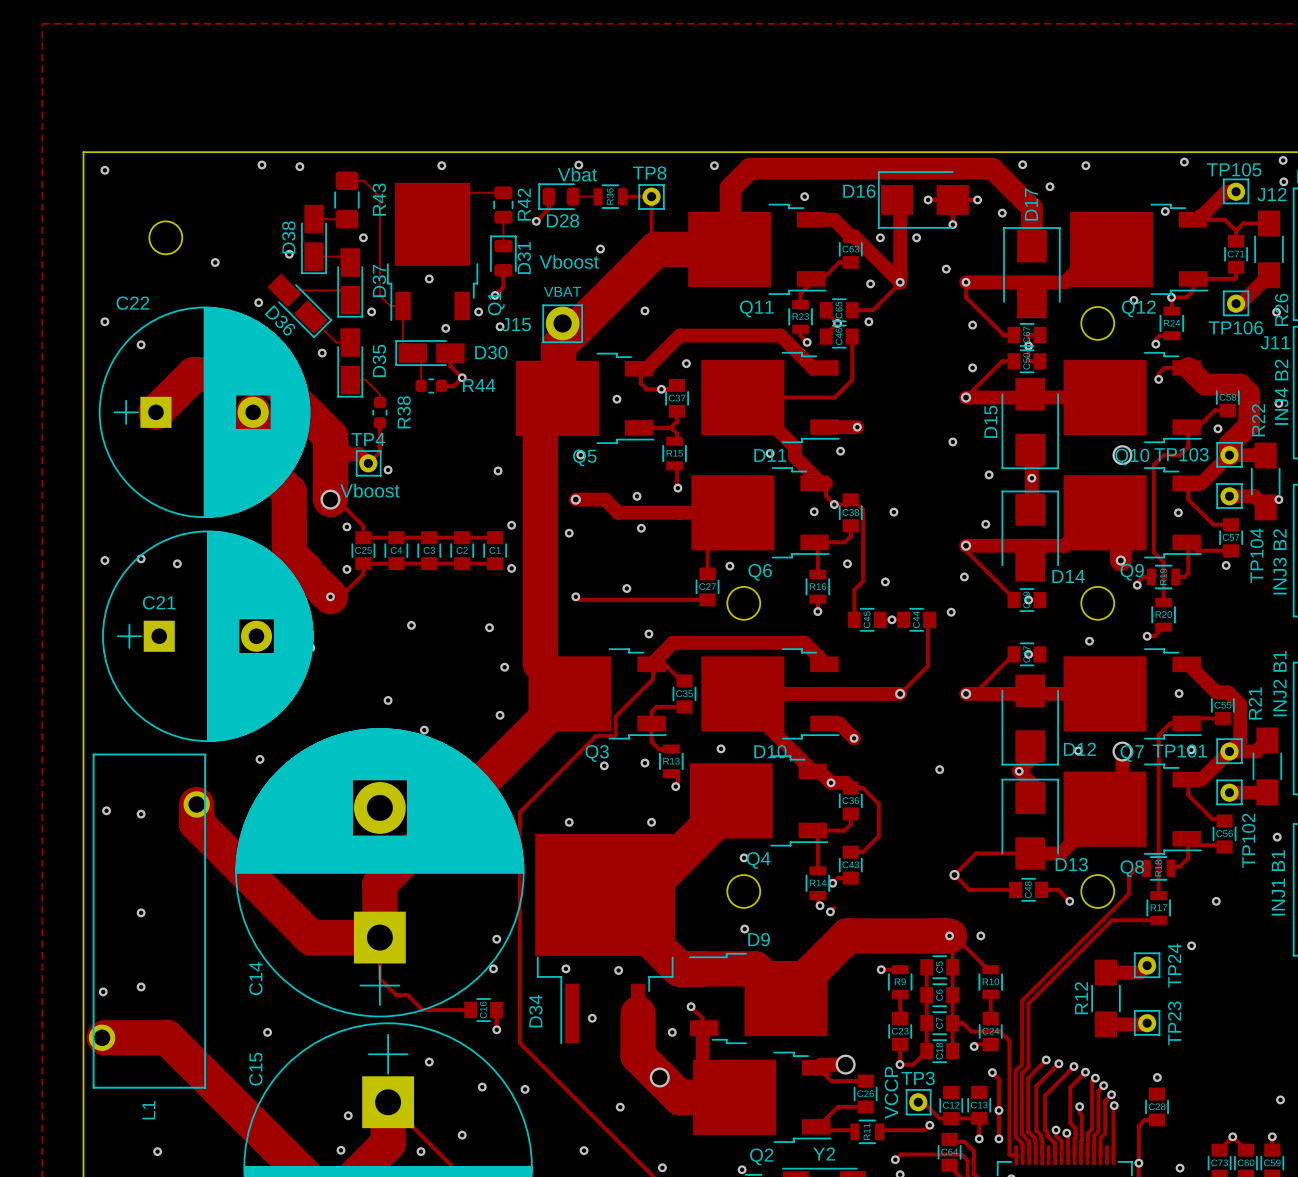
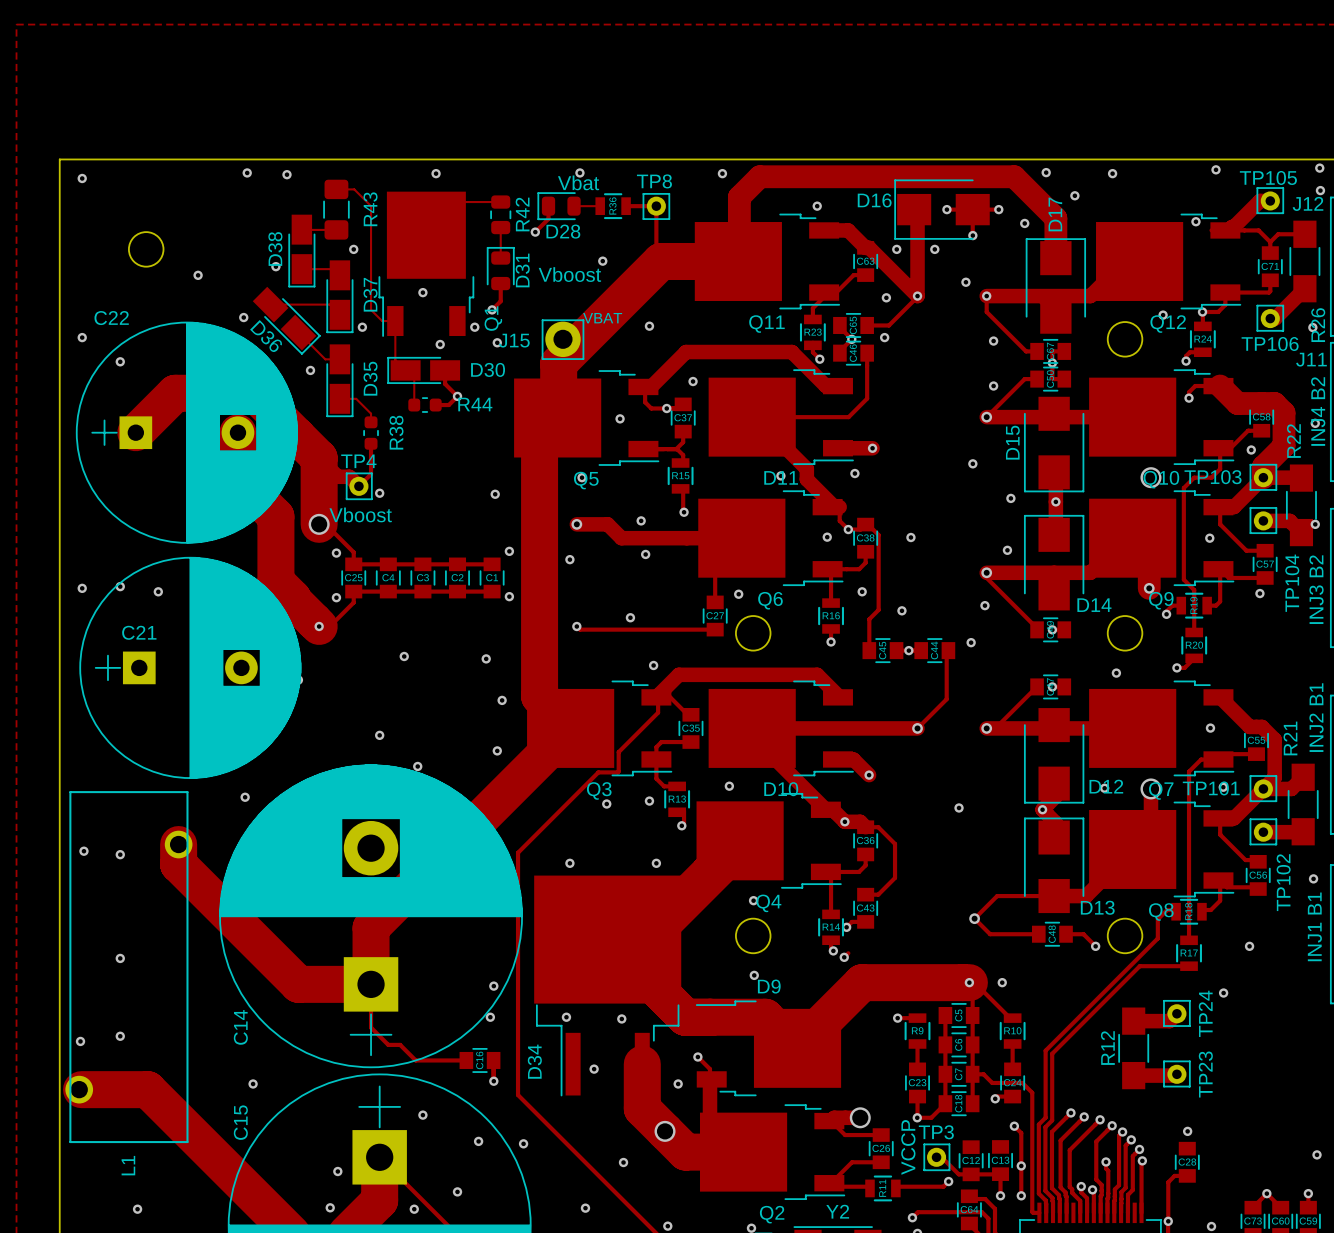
text position: VBAT (562, 291) -> VBAT (602, 318)

